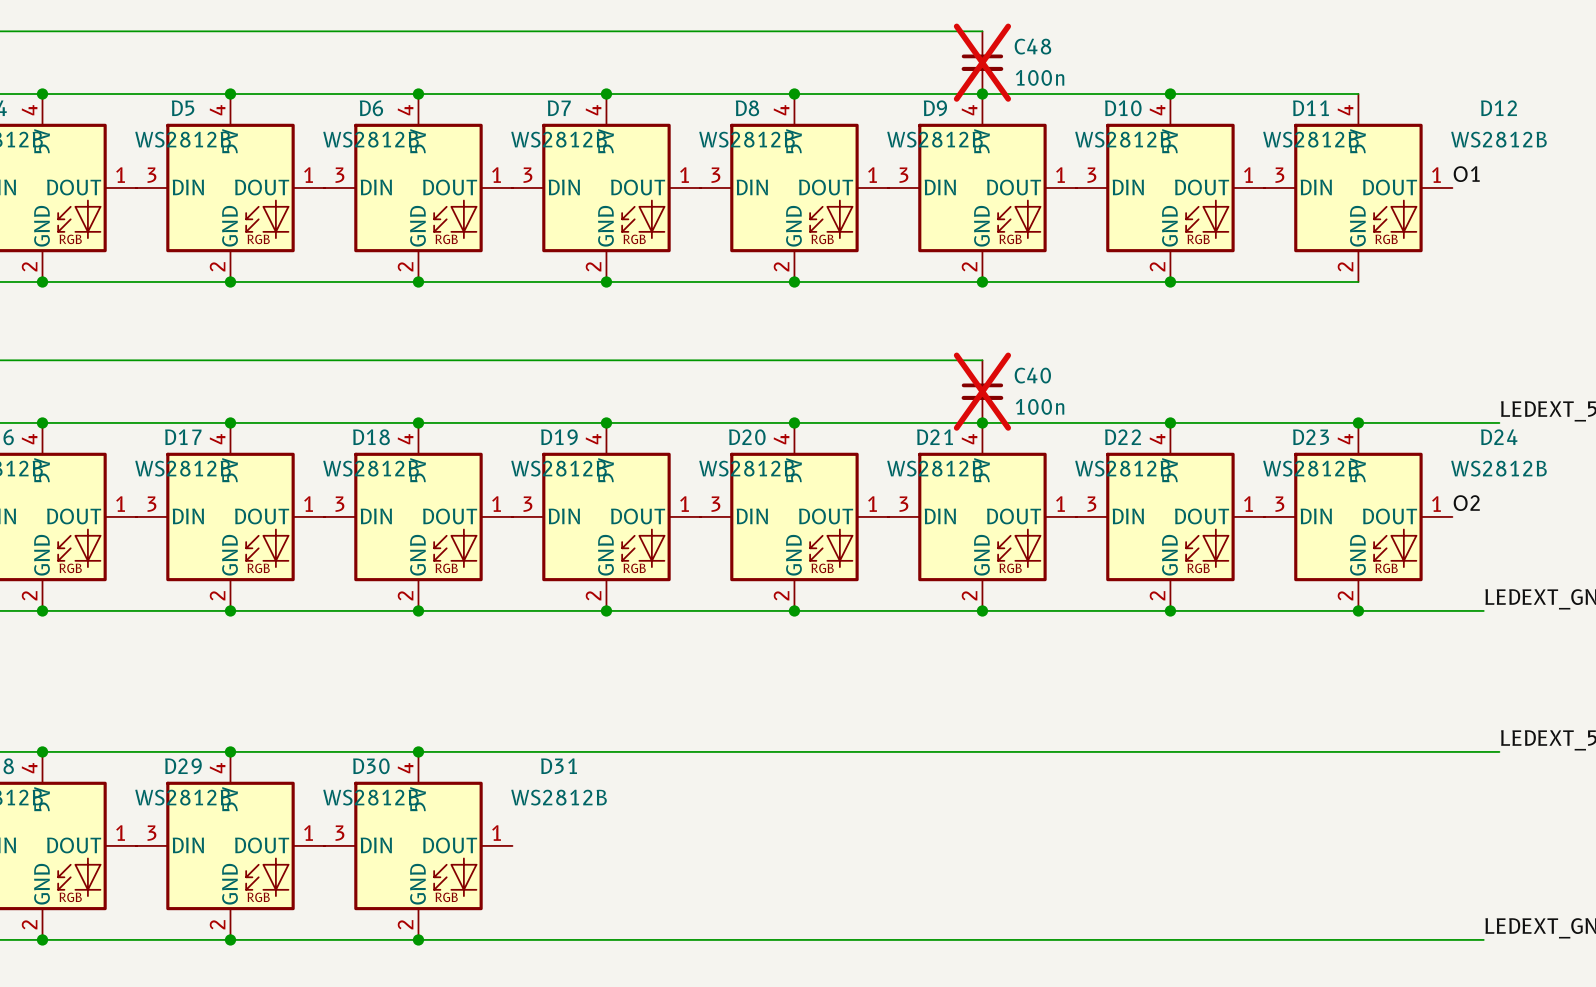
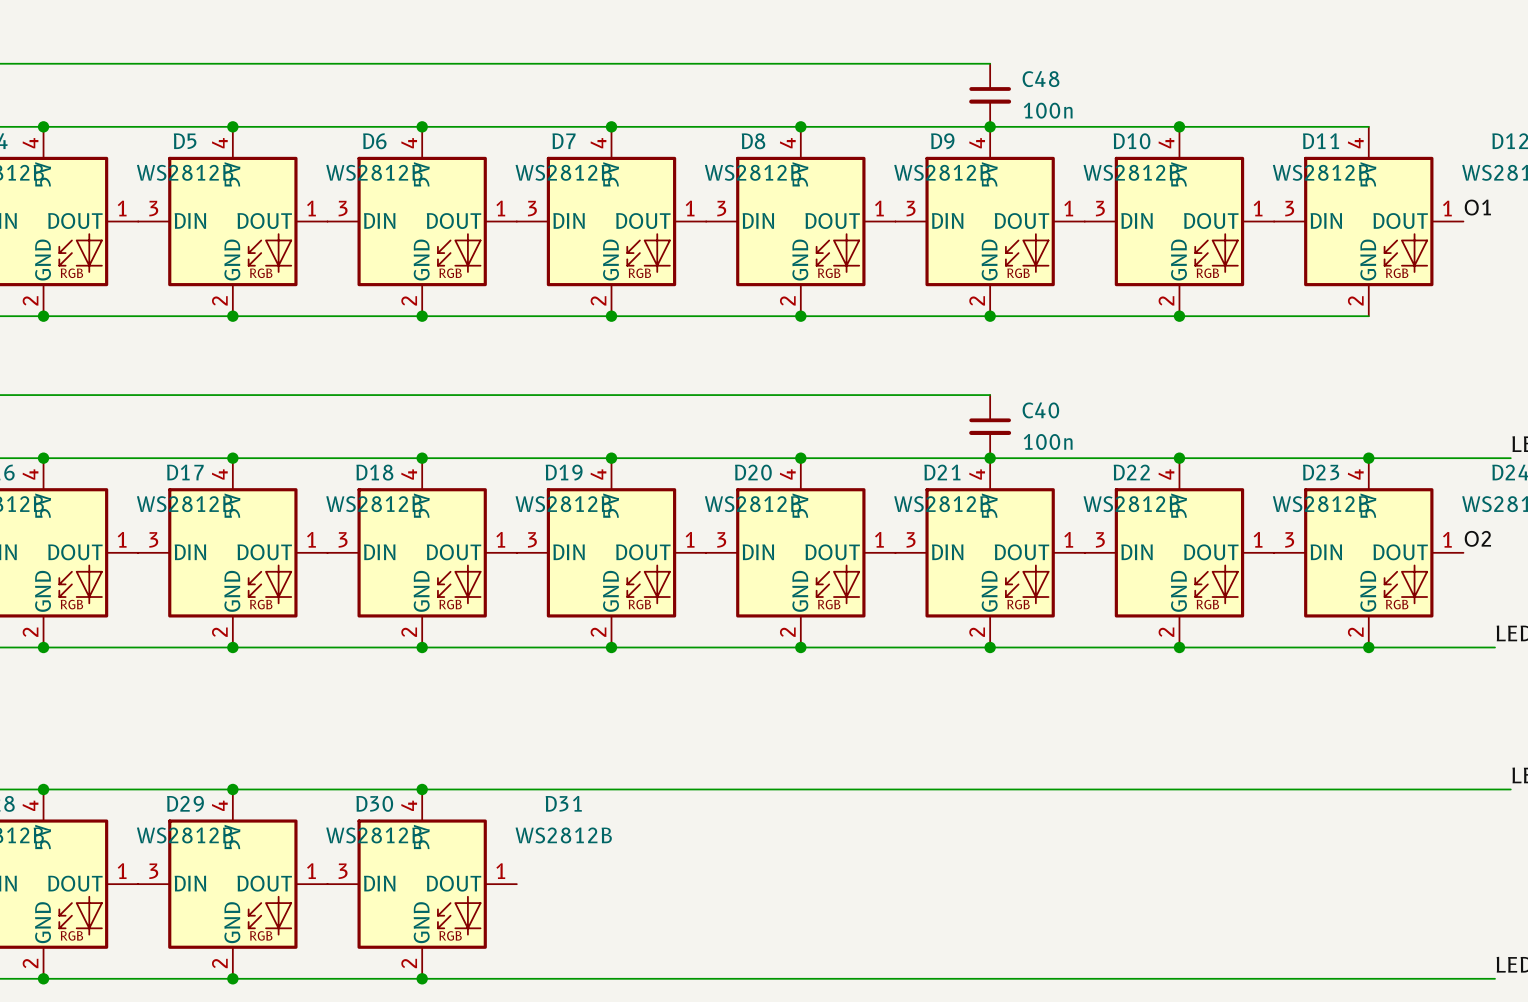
C48 do-not-place cross: (982, 62) -> none
C40 do-not-place cross: (982, 391) -> none

